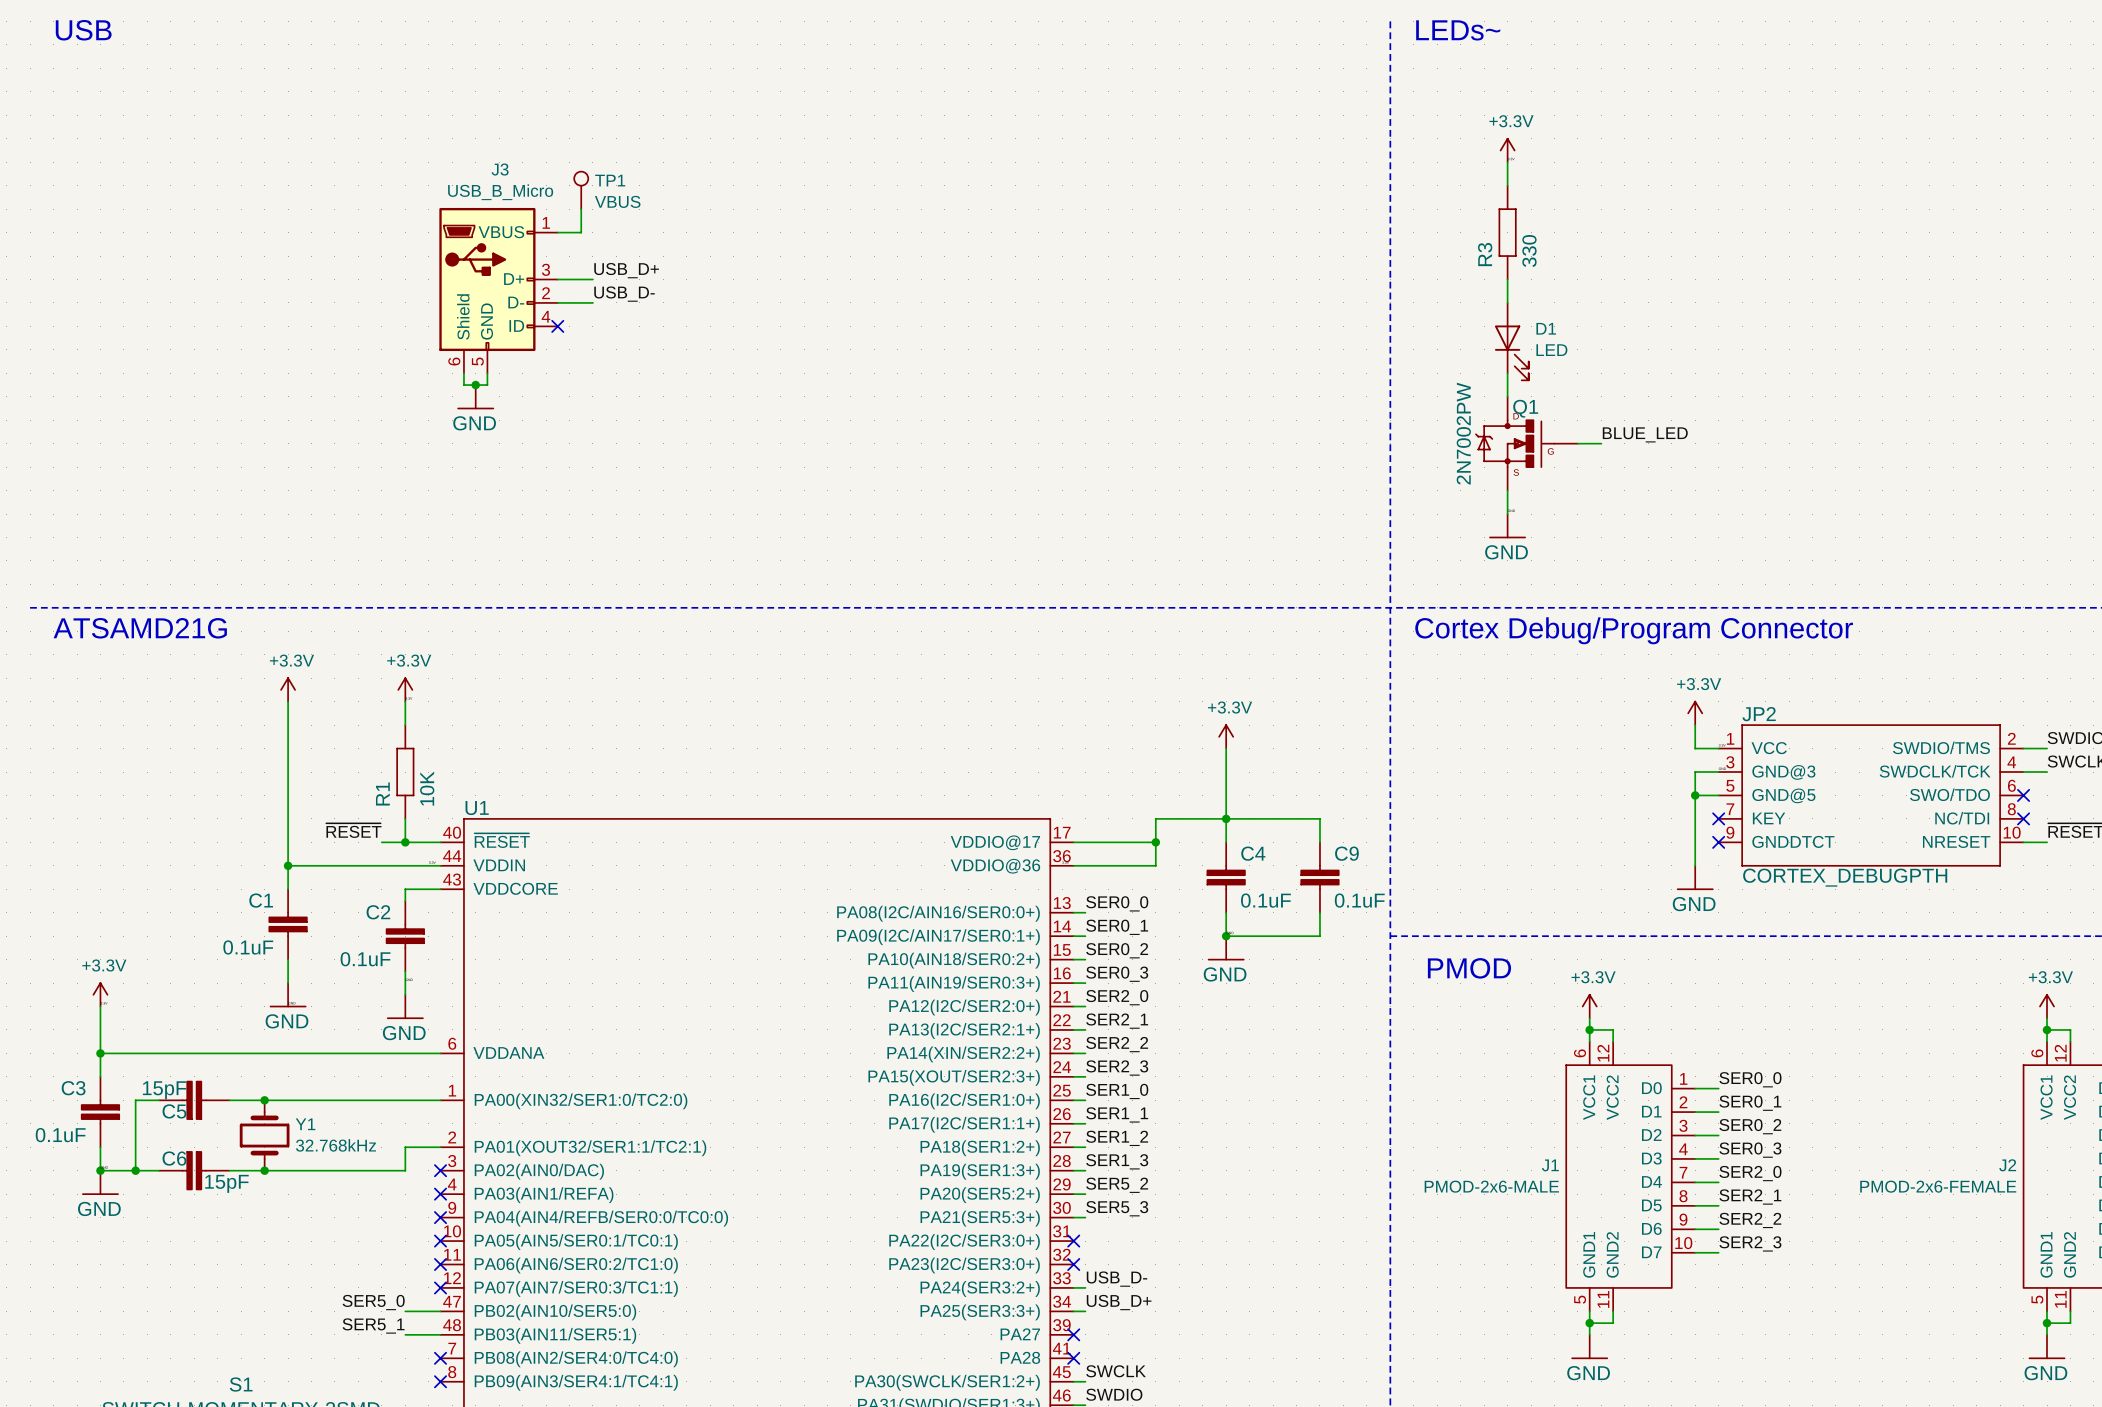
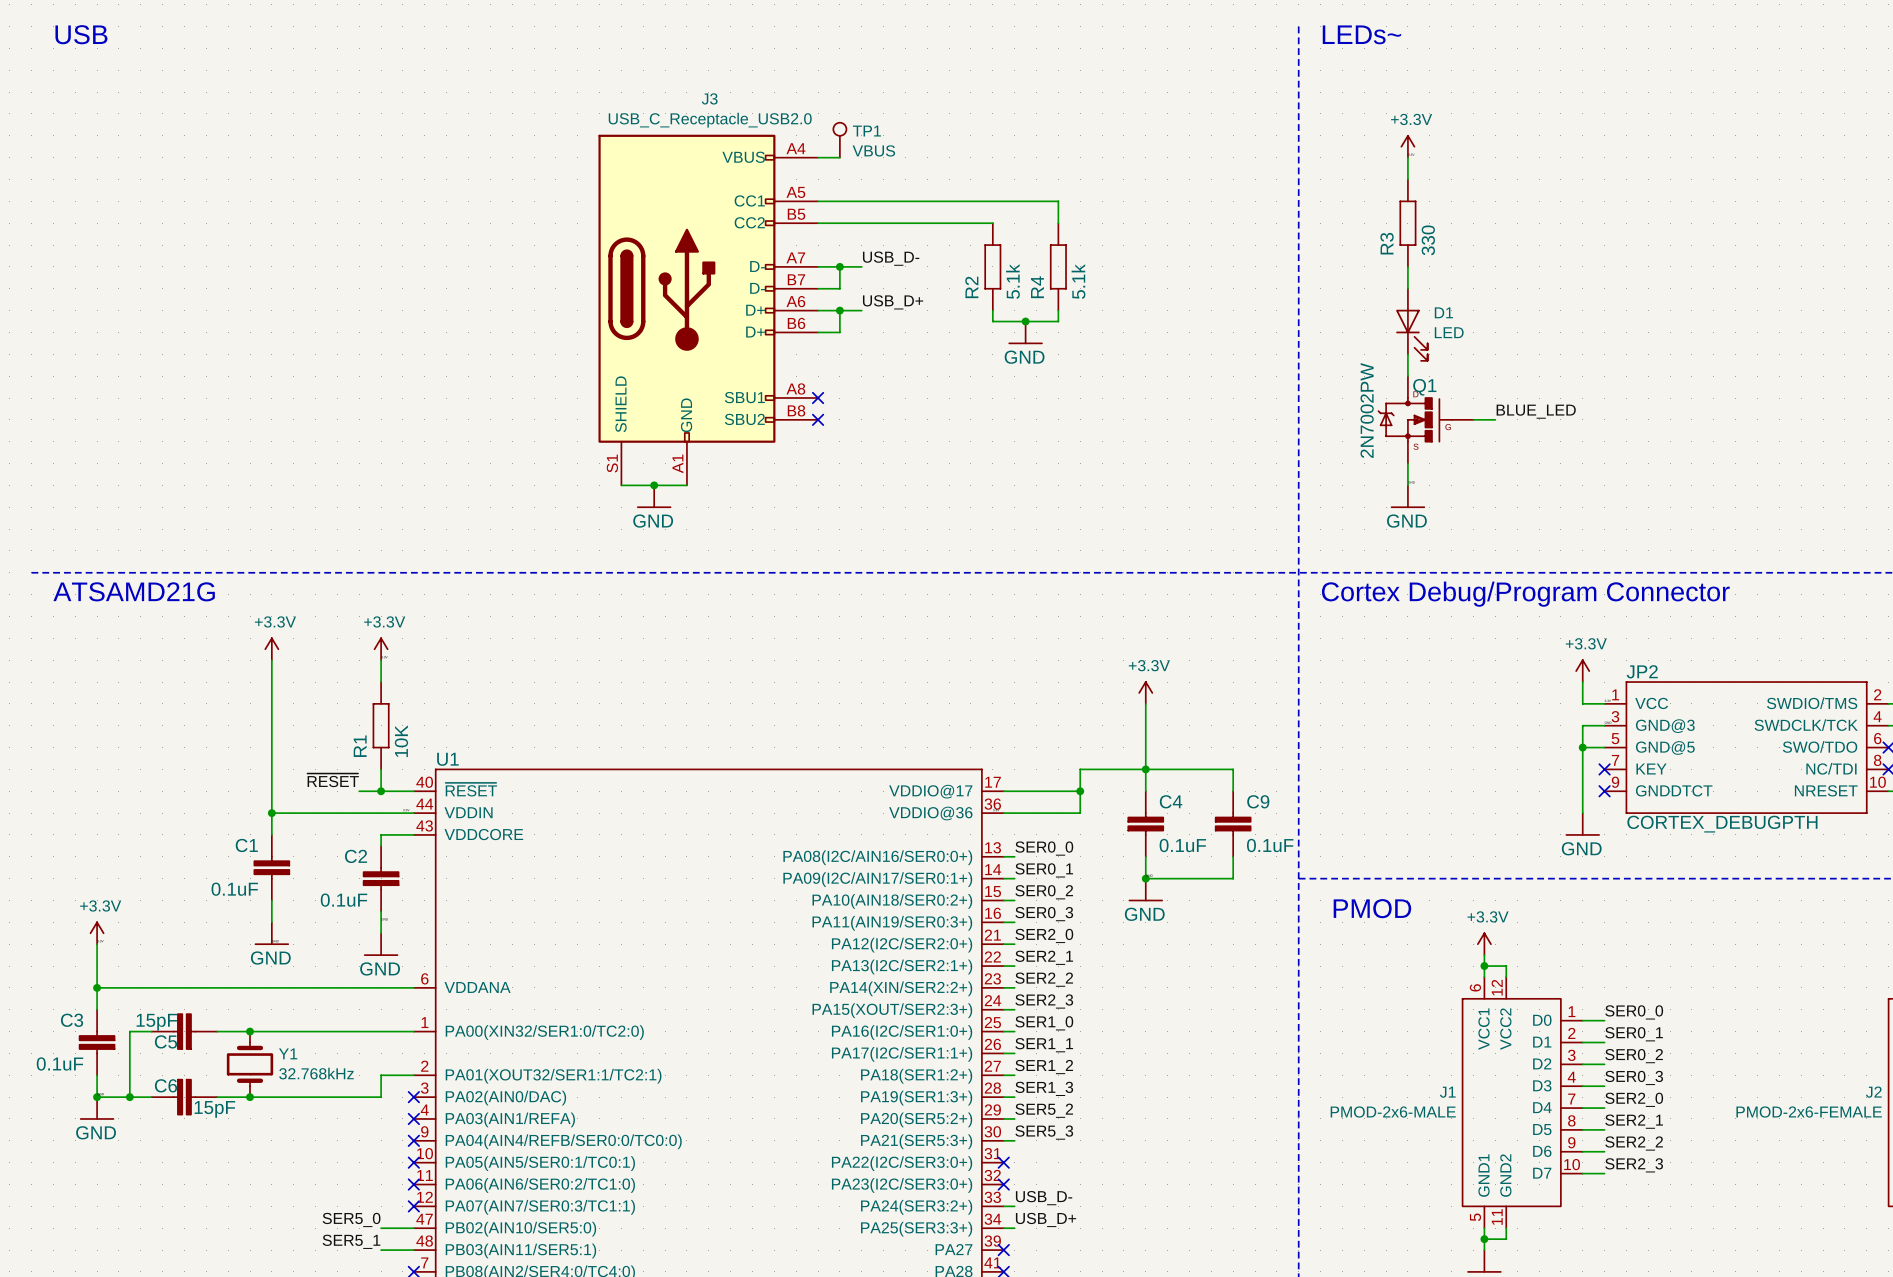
wire: none -> (818, 157) (839, 157)
J3 name position: J3 (500, 169) -> J3 (709, 98)
TP1 position: (581, 190) -> (839, 140)
J3 value: USB_B_Micro (500, 192) -> USB_C_Receptacle_USB2.0 (710, 120)
J3 symbol: [439, 207, 558, 374] -> [598, 134, 819, 486]
wire: (581, 209) (581, 232) (557, 232) -> none
wire: none -> (818, 201) (1058, 201) (1058, 223)
wire: none -> (818, 223) (992, 223)
label: USB_D+ (626, 270) -> none
label: none -> USB_D- (891, 258)
wire: (557, 279) (592, 279) -> none
wire: none -> (818, 266) (861, 266)
wire: none -> (839, 266) (839, 288) (818, 288)
junction: none -> (839, 266)
R2: none -> 5.1k (992, 266)
R4: none -> 5.1k (1058, 266)
label: USB_D- (624, 294) -> none
wire: (557, 302) (592, 302) -> none
label: none -> USB_D+ (893, 302)
no-connect mark: (557, 326) -> none
wire: none -> (818, 310) (861, 310)
wire: none -> (839, 310) (839, 332) (818, 332)
junction: none -> (839, 310)
wire: none -> (992, 310) (992, 321) (1058, 321) (1058, 310)
junction: none -> (1025, 321)
power symbol: none -> GND (1025, 332)
wire: (463, 373) (463, 385) (487, 385) (487, 373) -> none
junction: (475, 385) -> none
power symbol: GND (475, 396) -> none
no-connect mark: none -> (818, 398)
no-connect mark: none -> (818, 419)
wire: none -> (621, 485) (686, 485)
junction: none -> (654, 485)
power symbol: none -> GND (654, 496)

